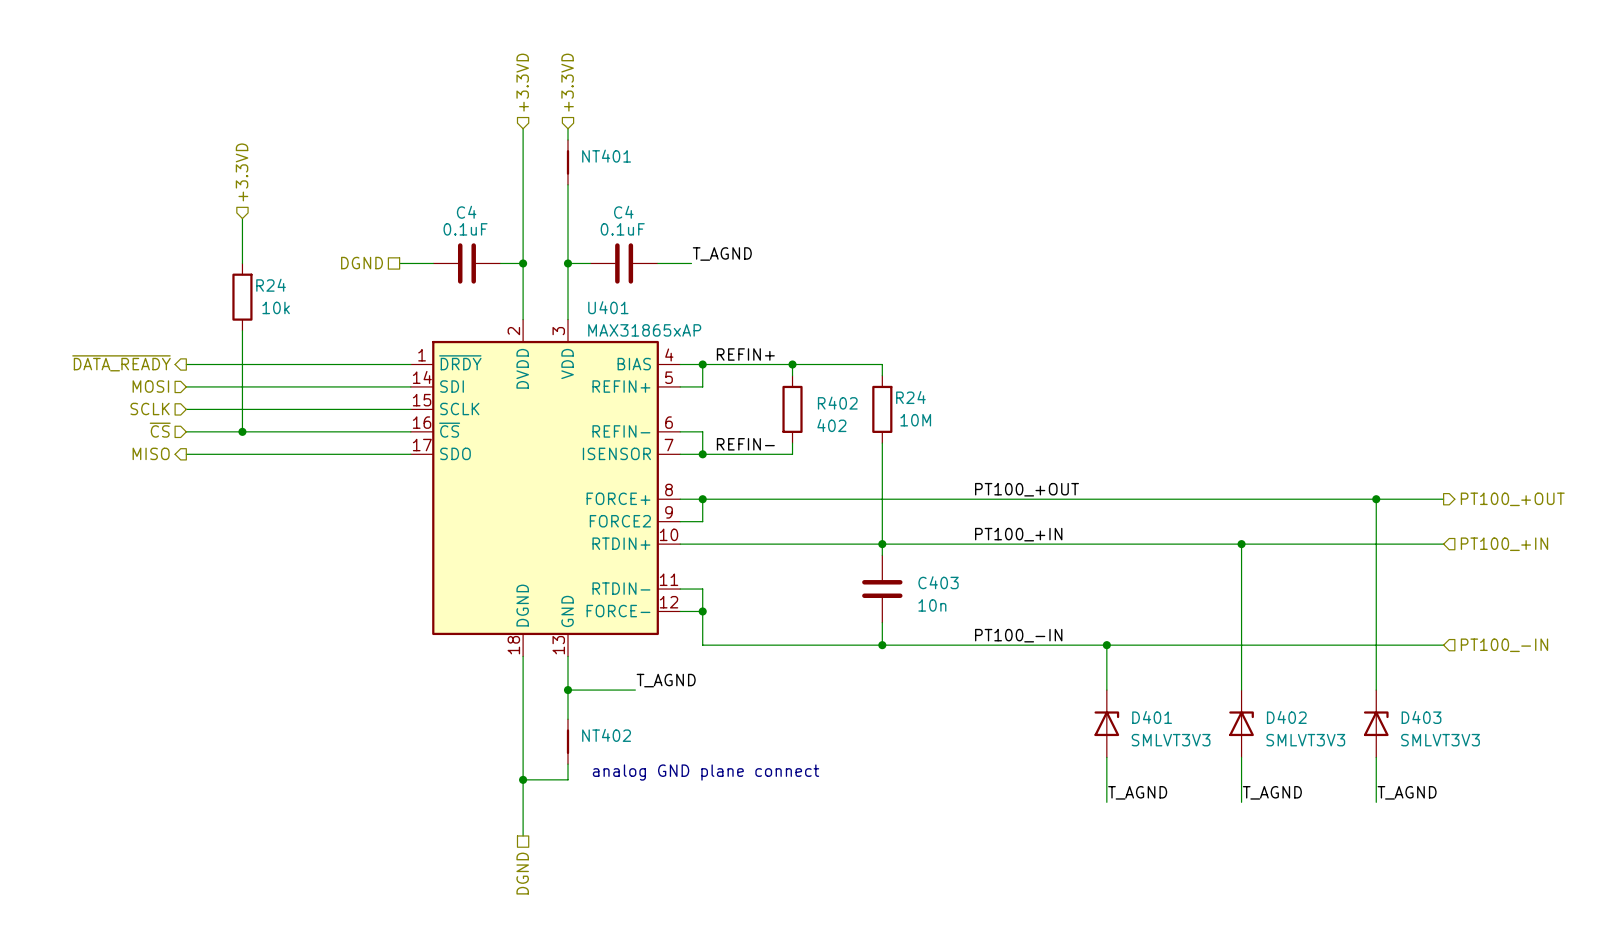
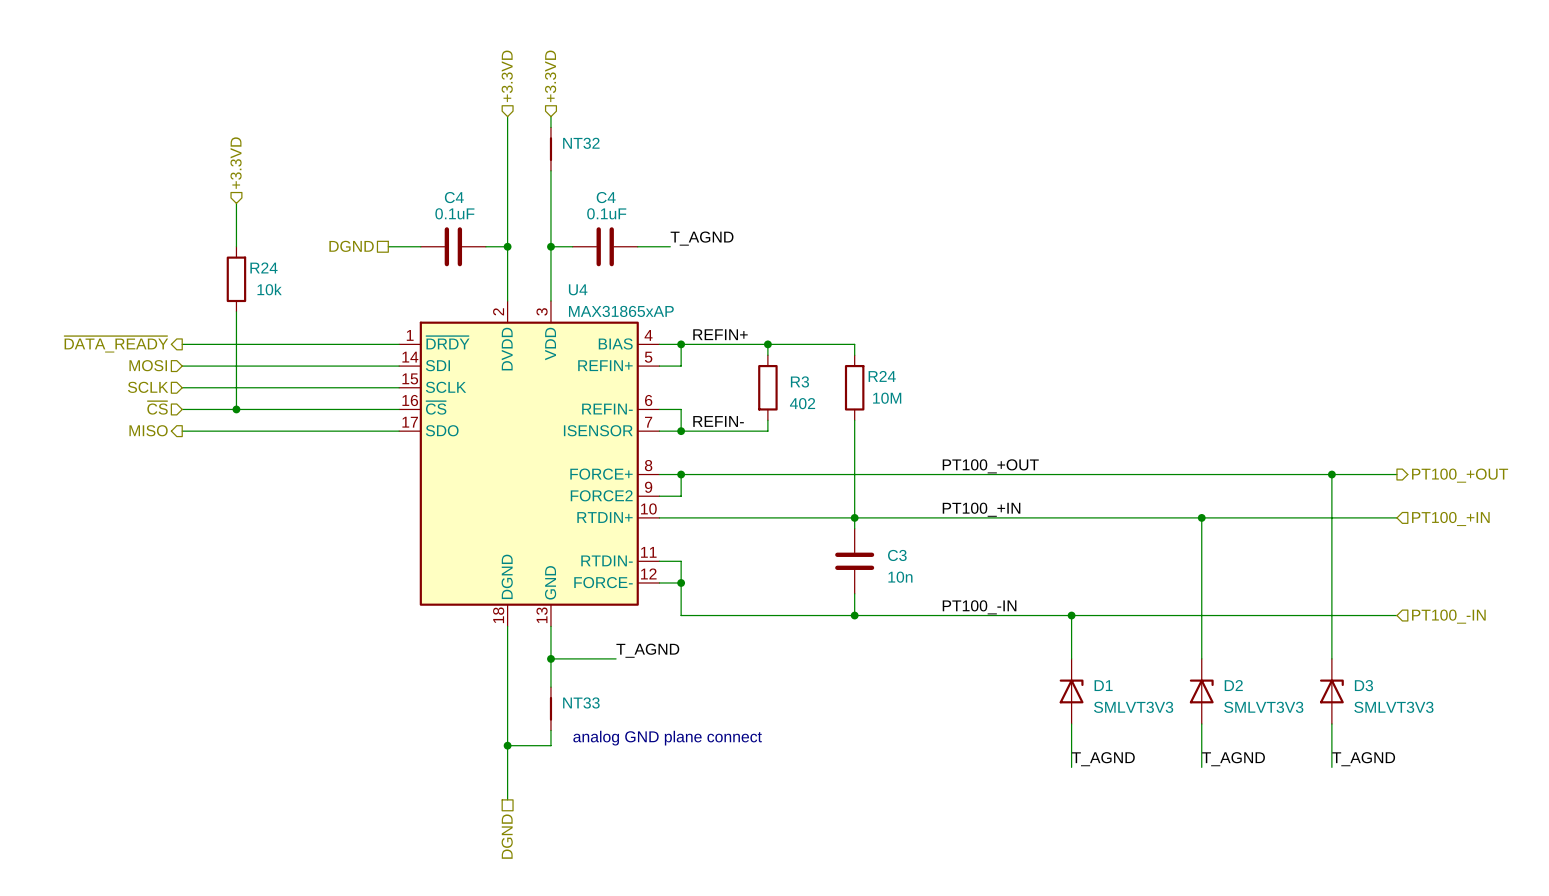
NT401 name: NT401 (606, 156) -> NT32 (581, 143)
U401 name: U401 (608, 307) -> U4 (578, 289)
R402 name: R402 (837, 403) -> R3 (799, 381)
C403 name: C403 (938, 582) -> C3 (897, 555)
D401 name: D401 (1152, 717) -> D1 (1103, 685)
D402 name: D402 (1286, 717) -> D2 (1233, 685)
D403 name: D403 (1421, 717) -> D3 (1363, 685)
NT402 name: NT402 (606, 735) -> NT33 (581, 702)

